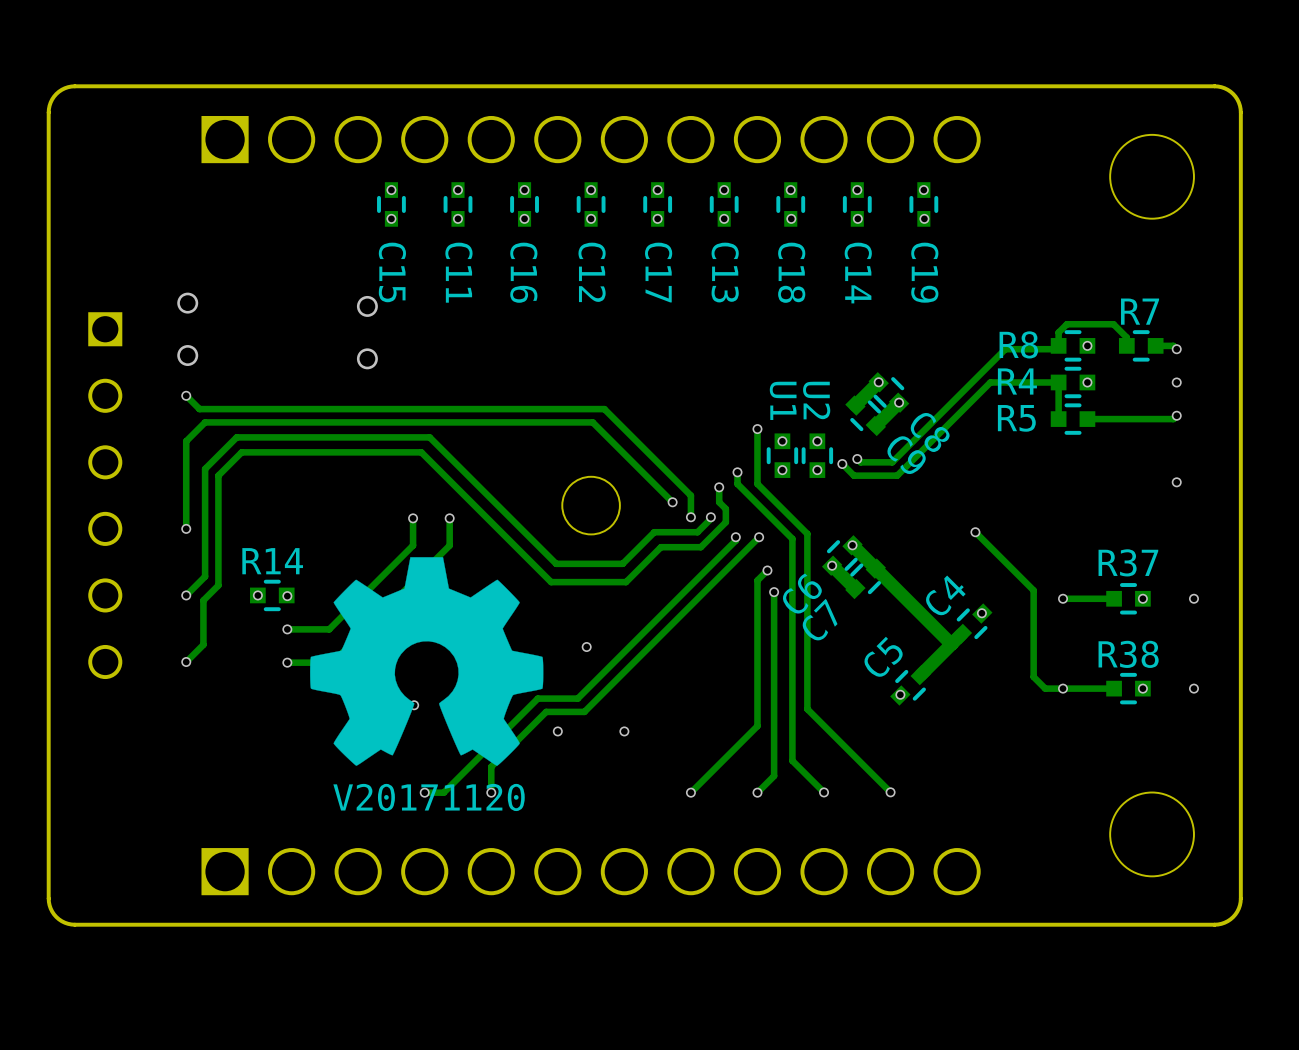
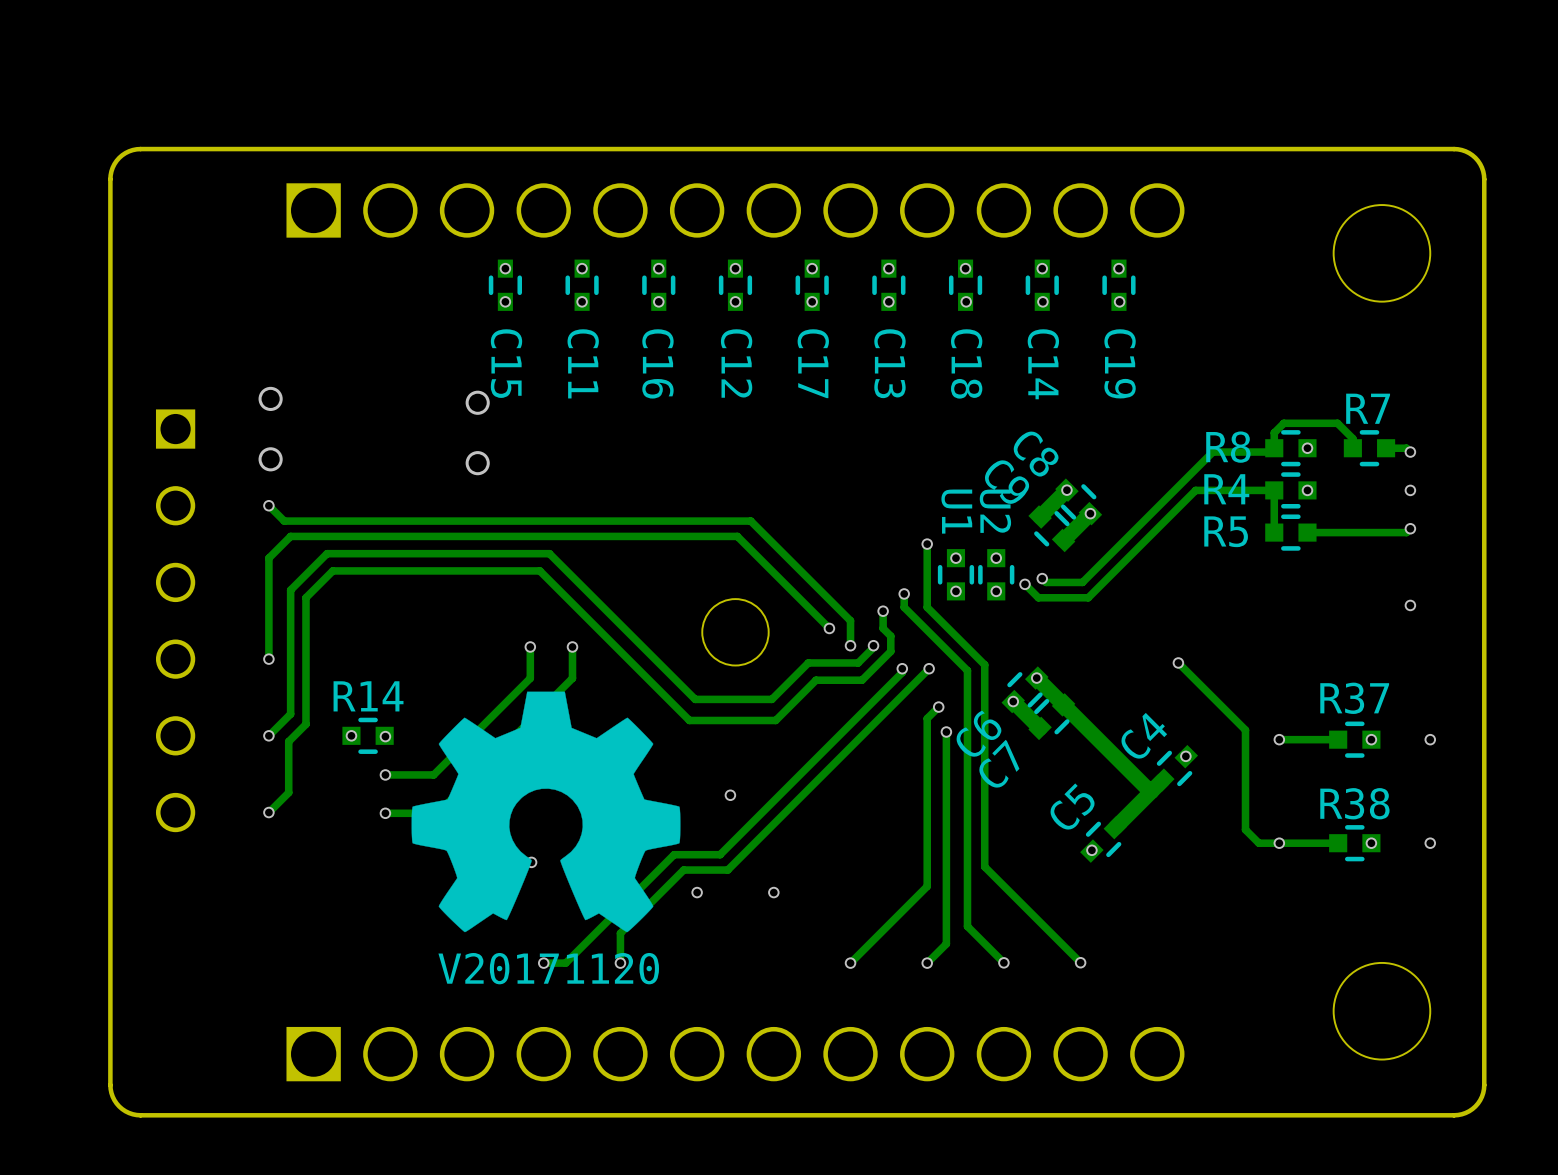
C8 name position: C8 (930, 432) -> C8 (1035, 453)
C9 name position: C9 (906, 455) -> C9 (1007, 482)

